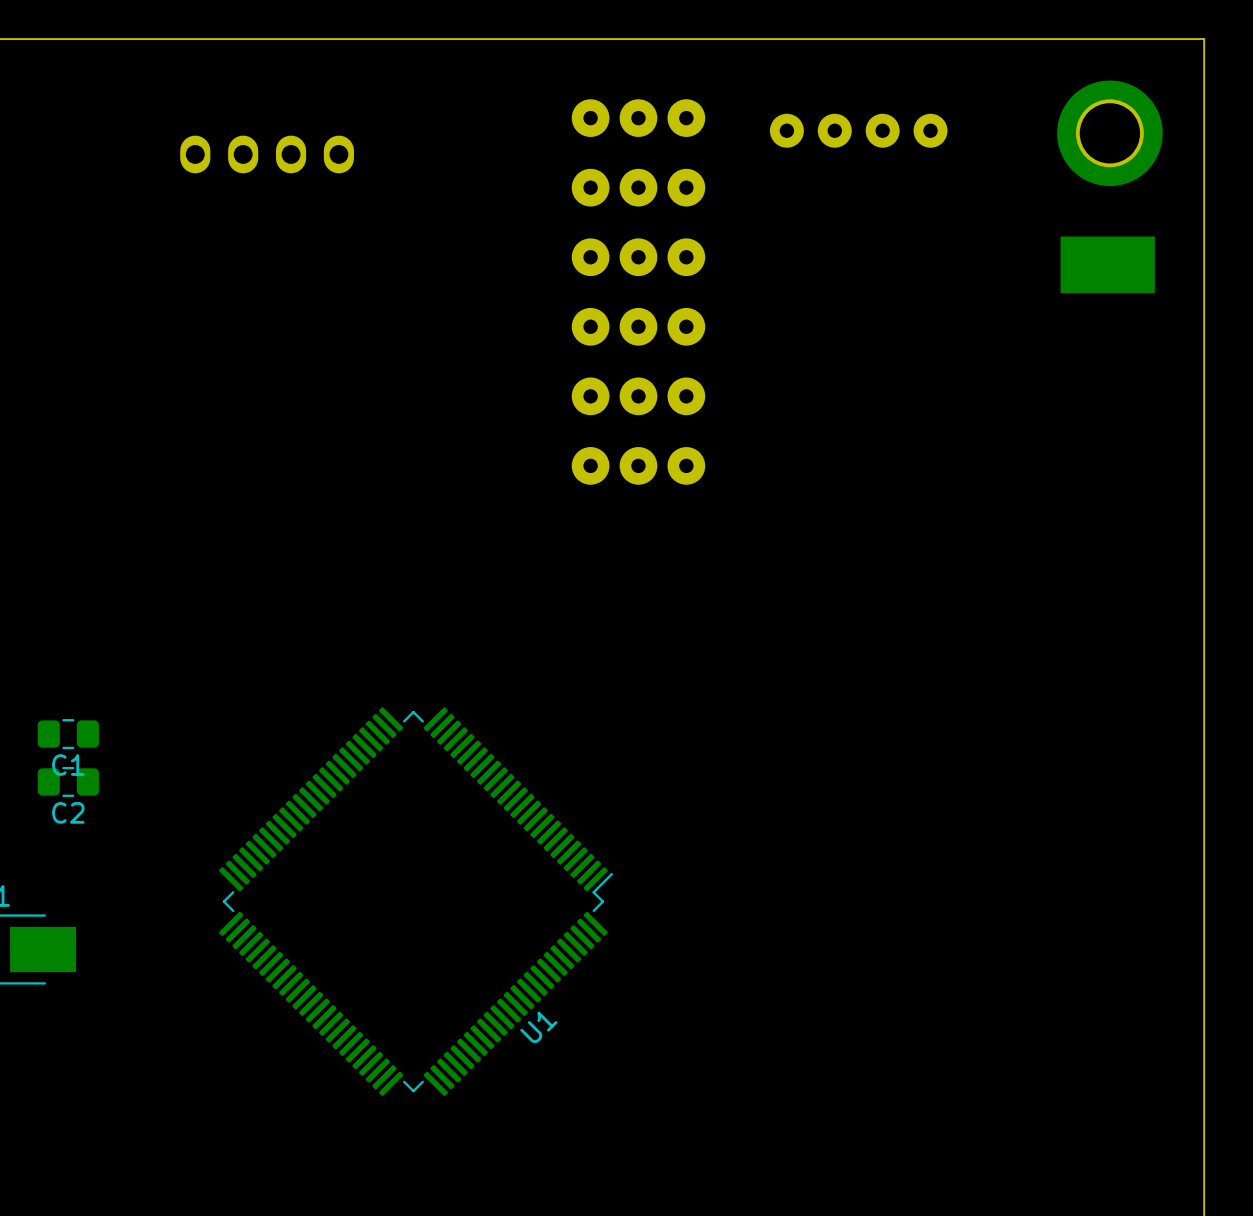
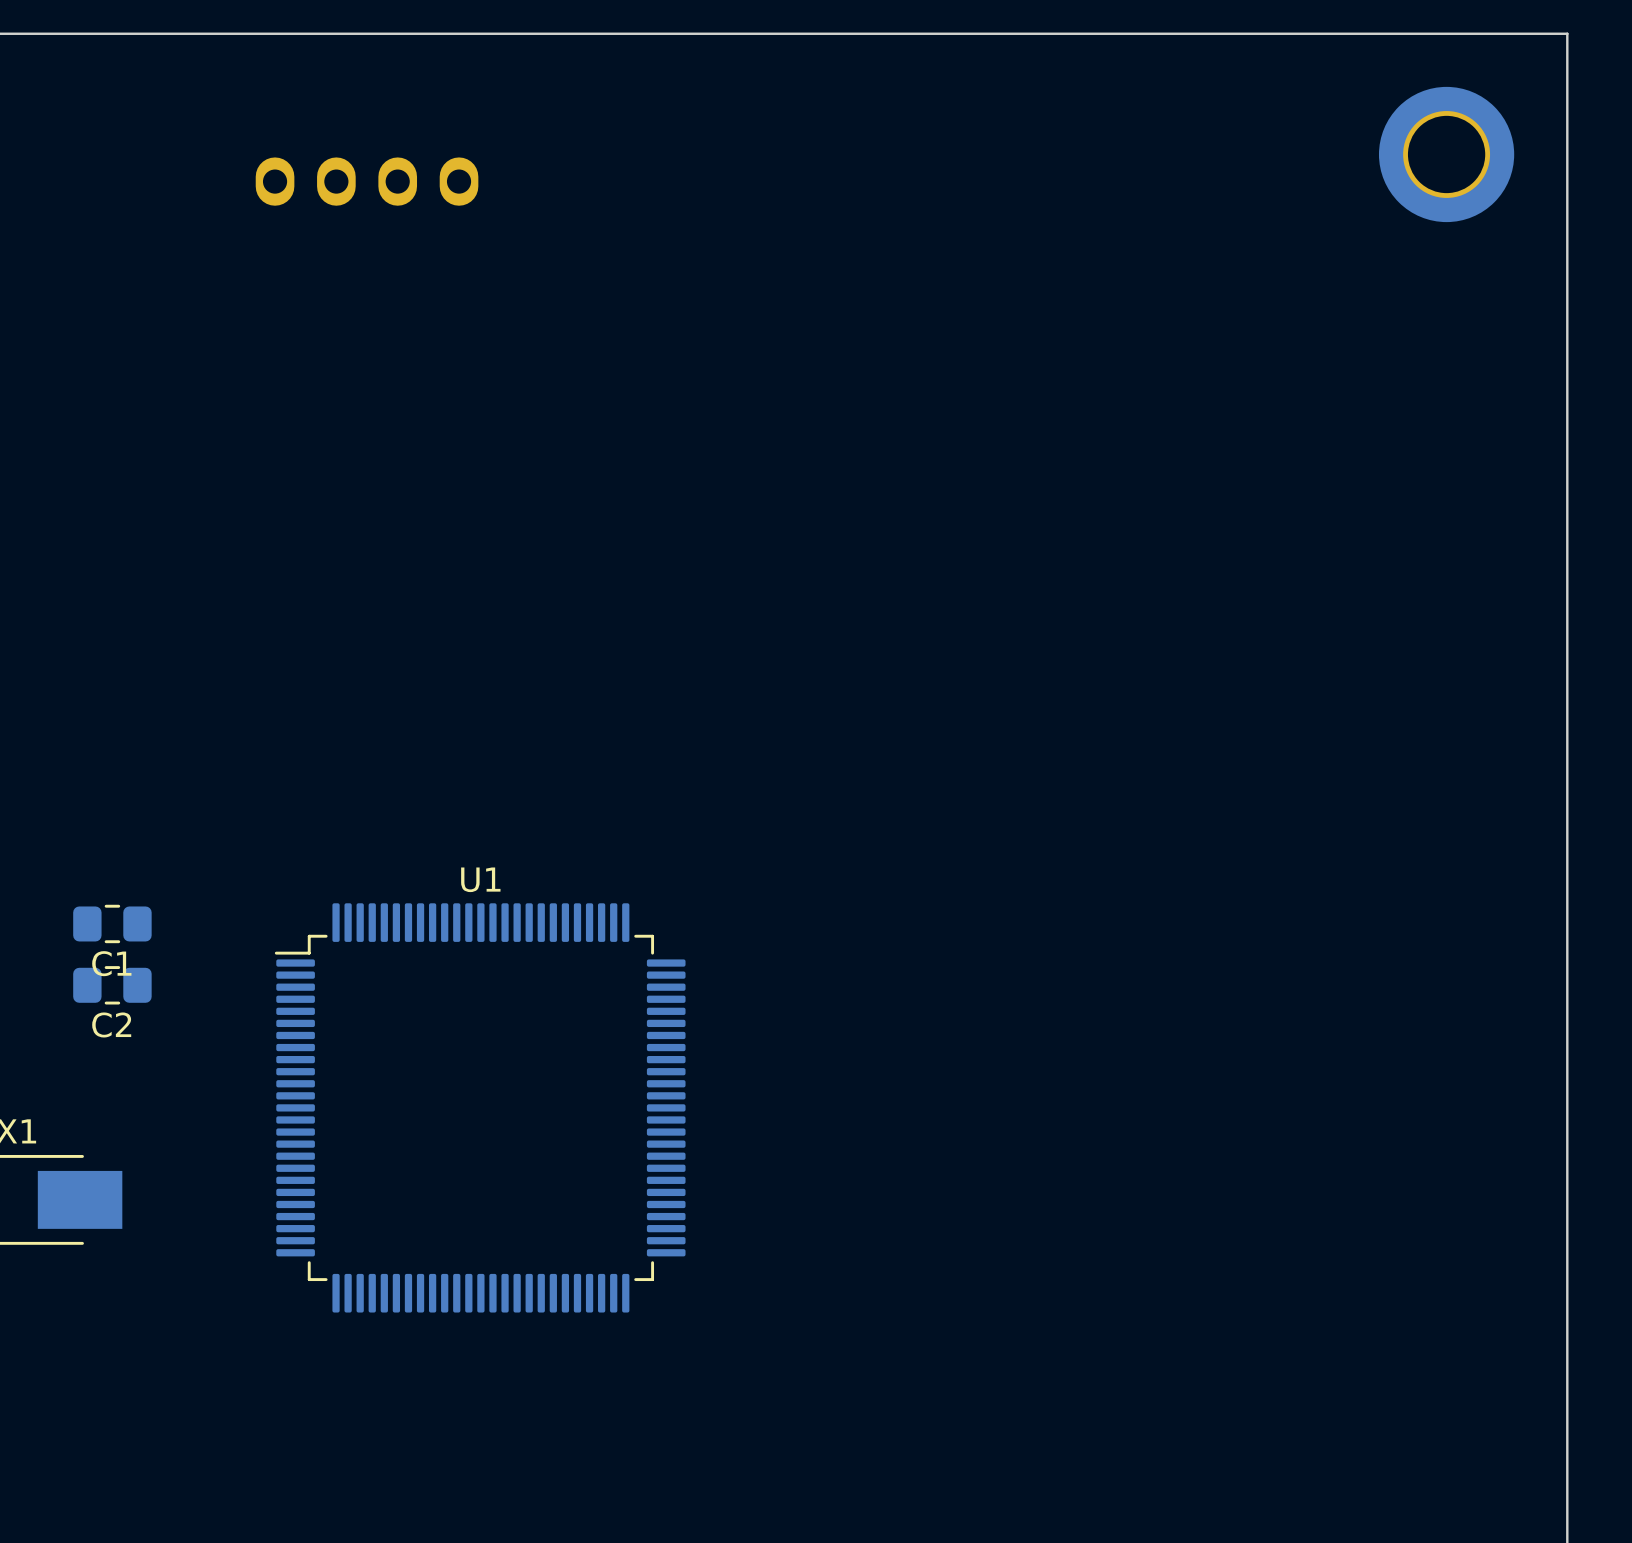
part: (638, 118) -> none
part: (858, 130) -> none
part: (638, 187) -> none
part: (638, 257) -> none
part: (1107, 264) -> none
part: (638, 326) -> none
part: (638, 396) -> none
part: (638, 465) -> none
U1 rotation: 0° (416, 901) -> 135° counterclockwise (480, 1107)

